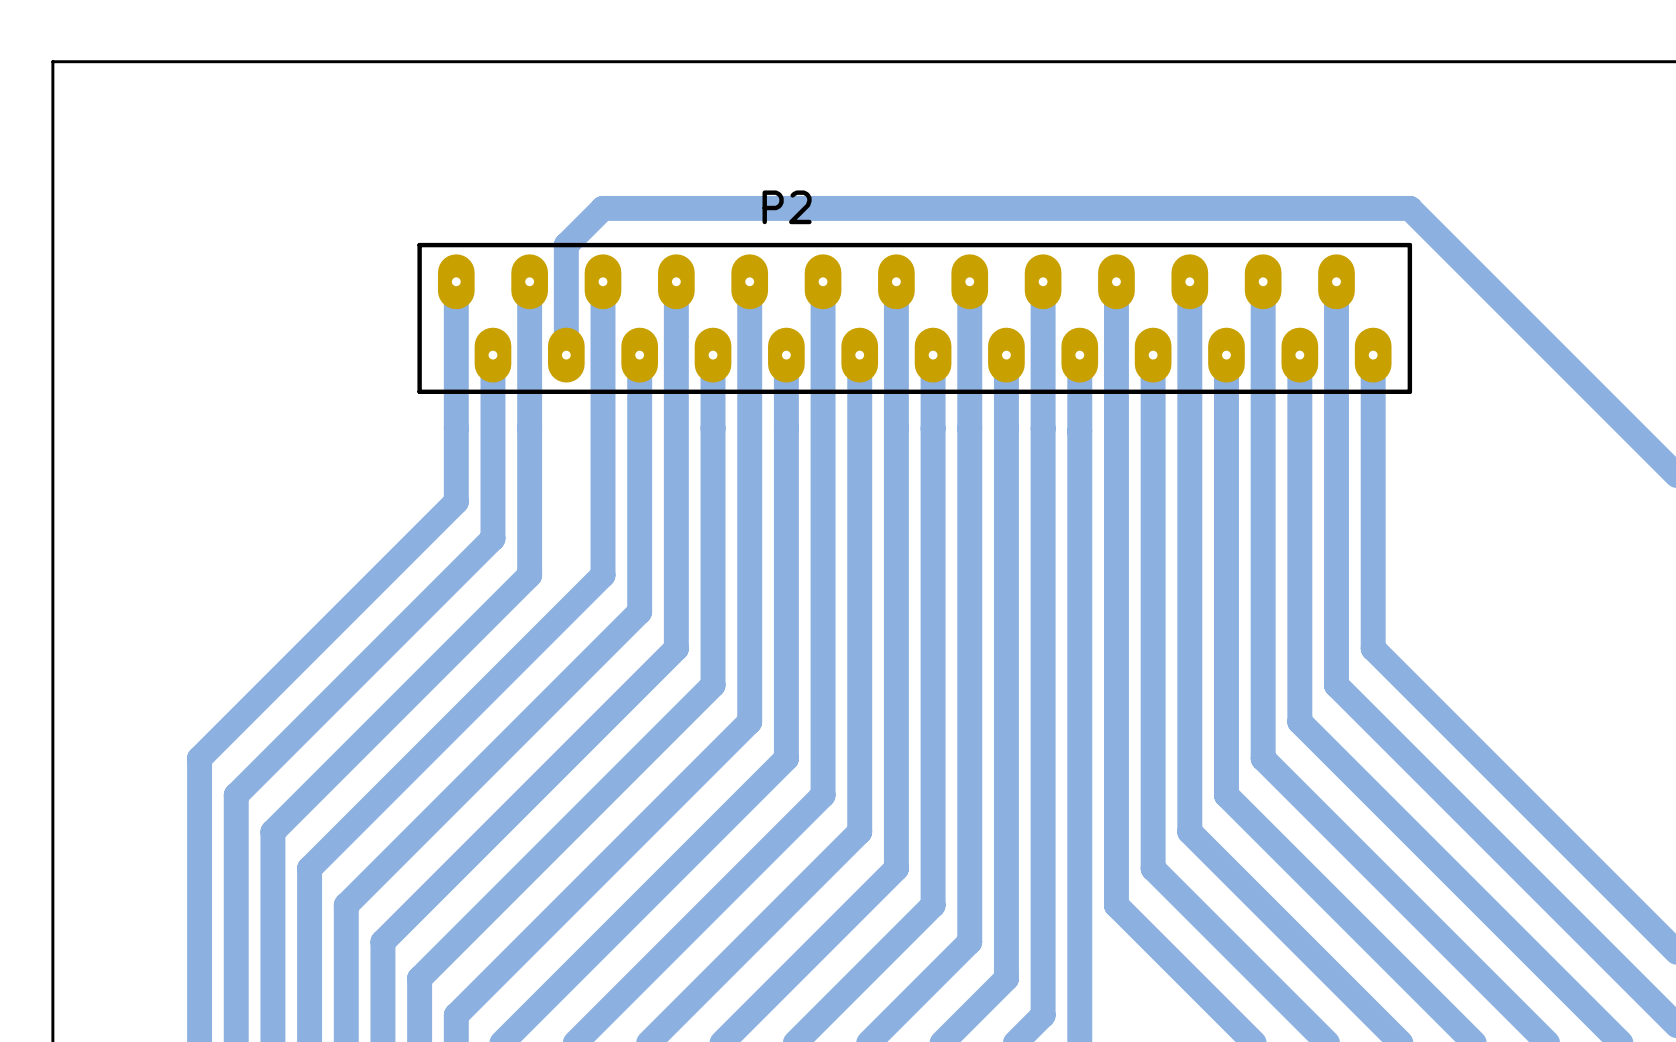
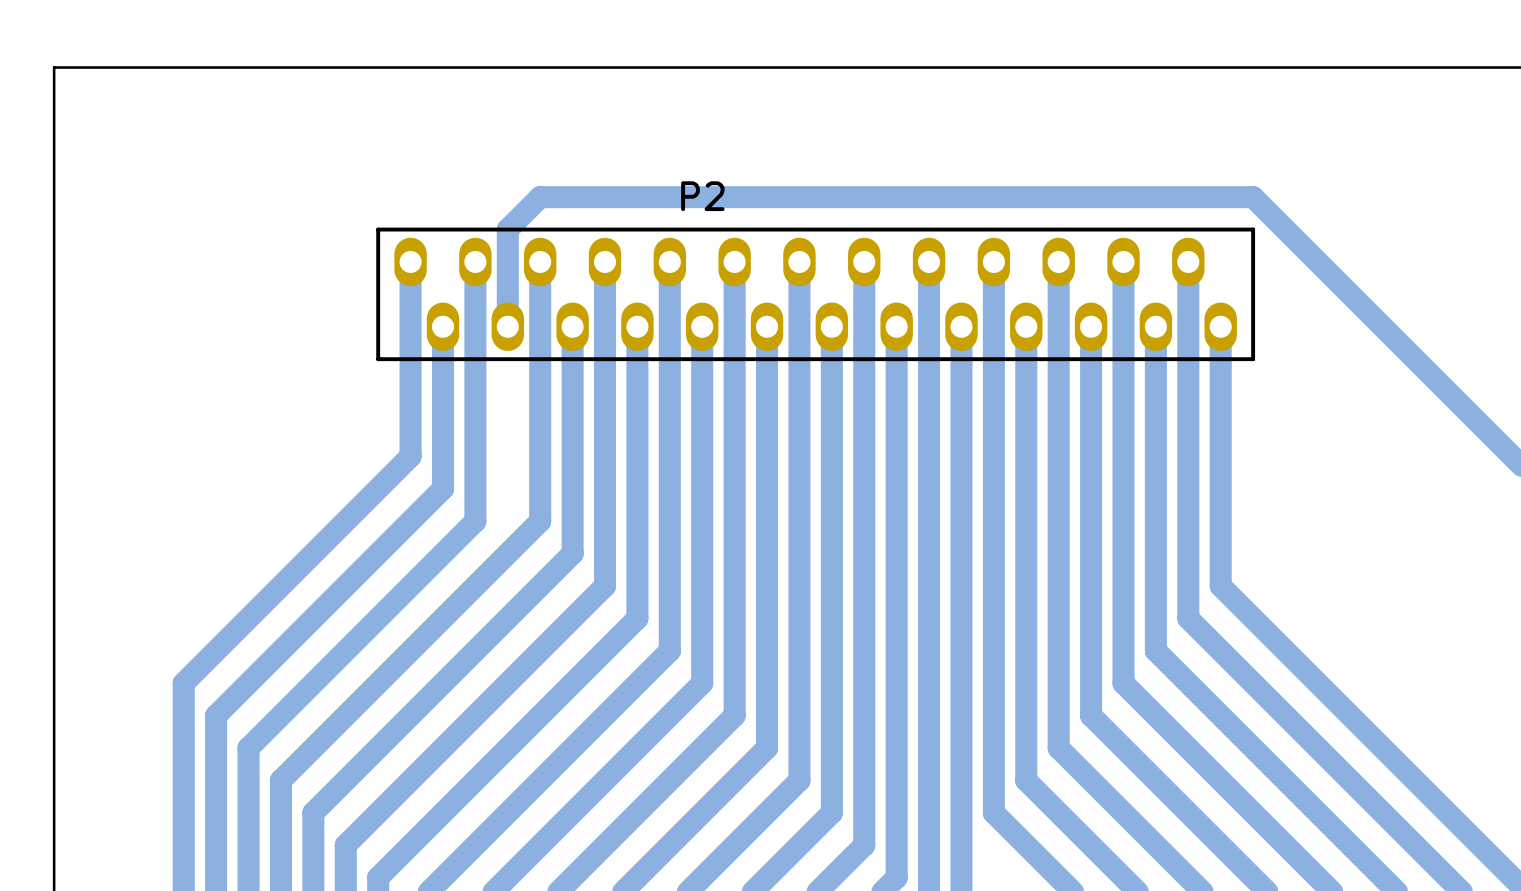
P2 footprint: [417, 242, 1413, 394] -> [376, 227, 1256, 362]

